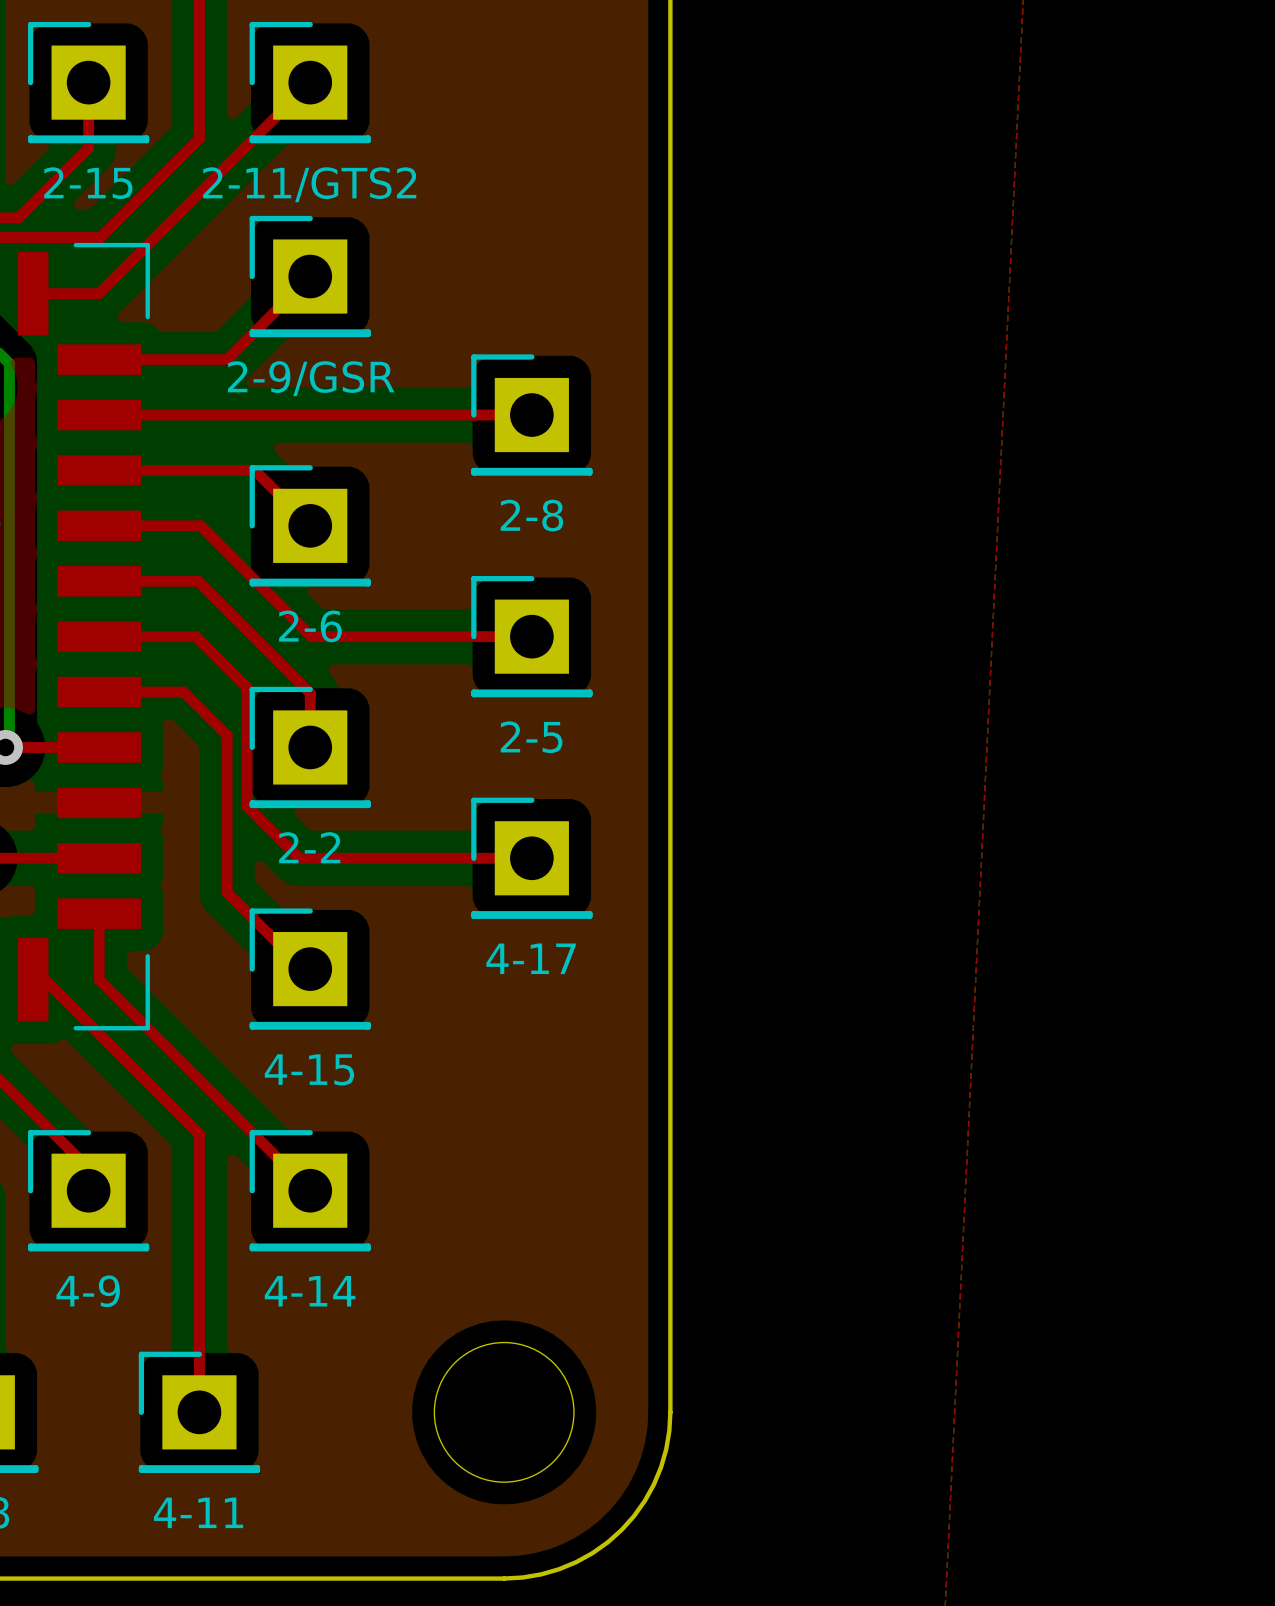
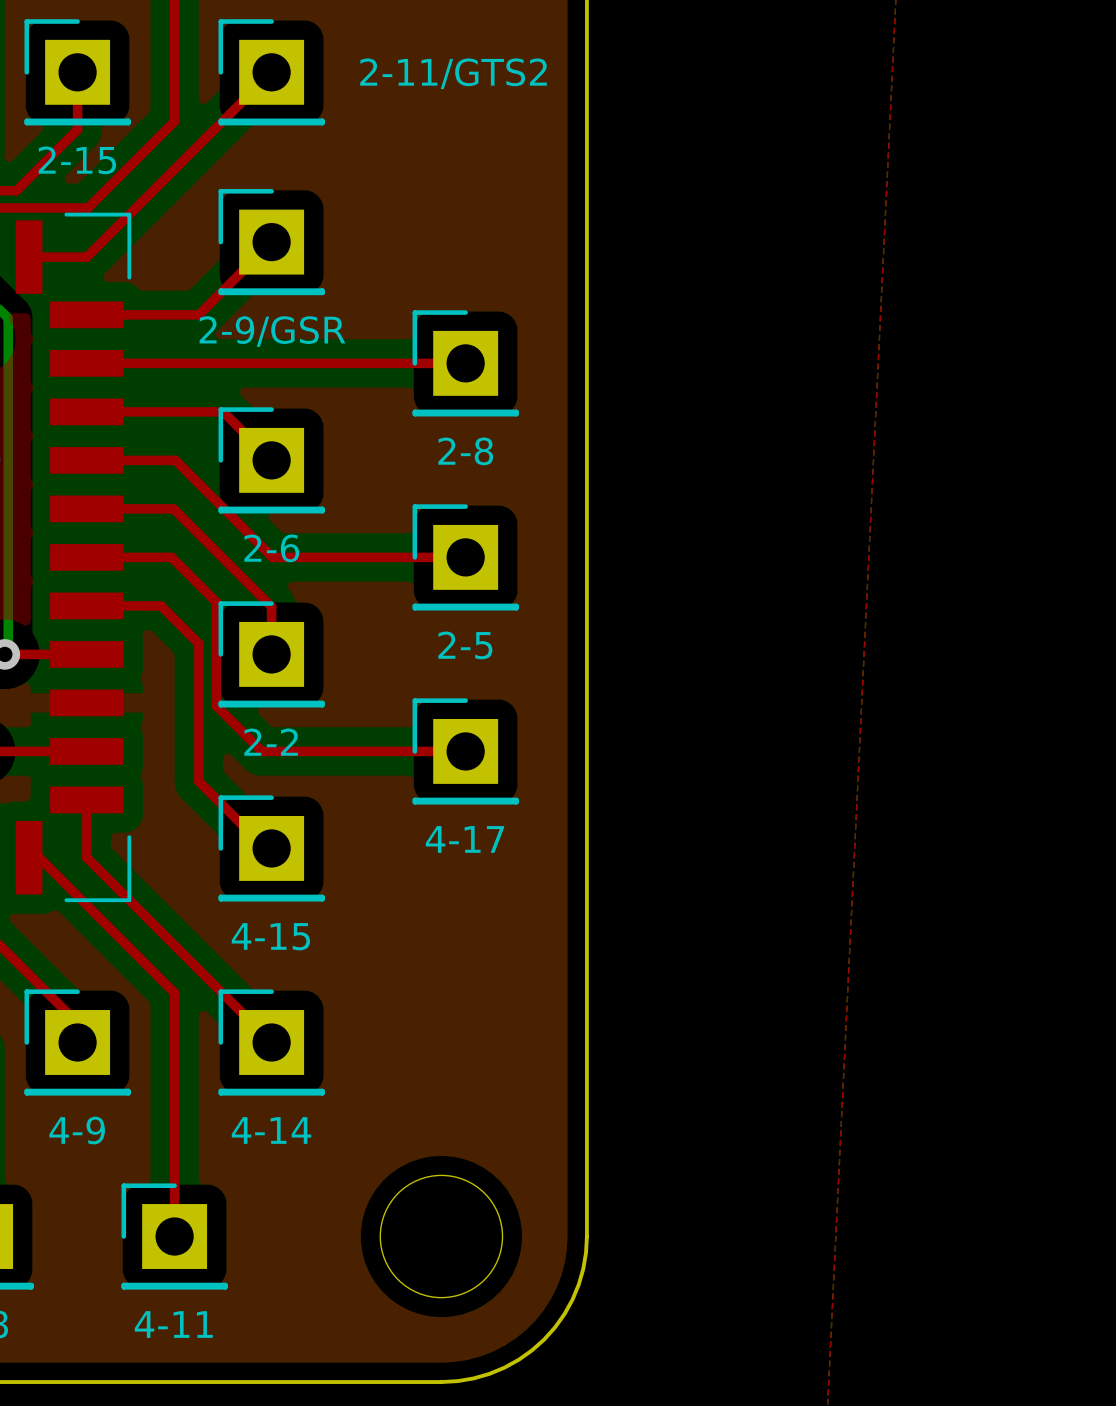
part value position: 2-11/GTS2 (309, 184) -> 2-11/GTS2 (453, 73)

